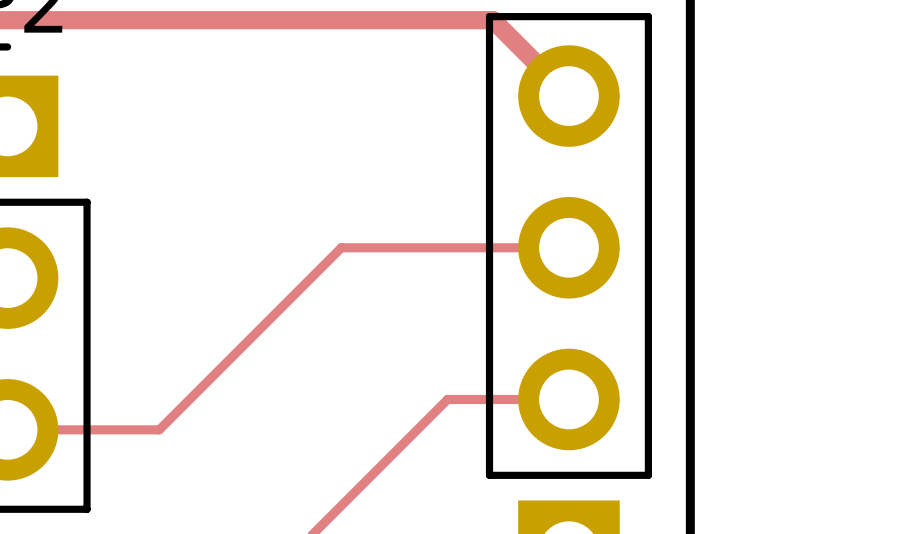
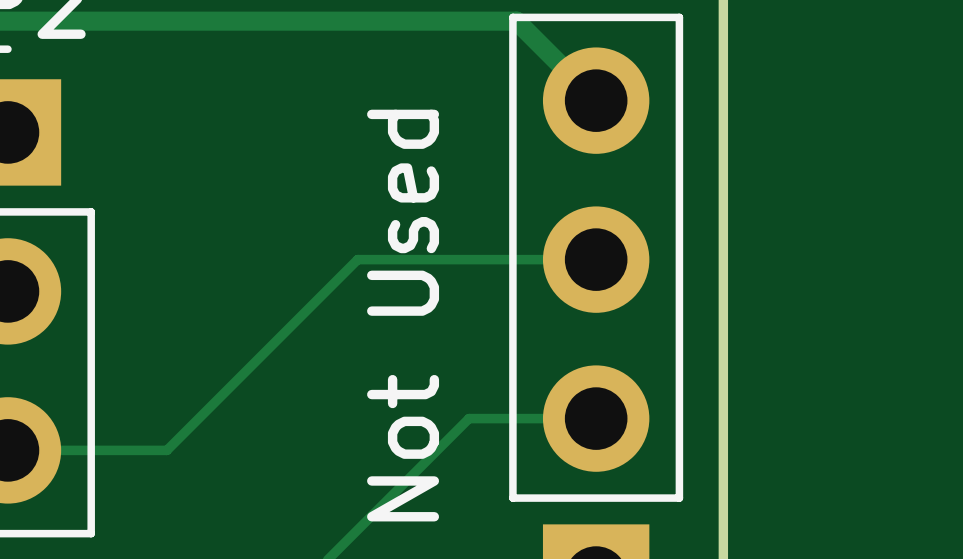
text: none -> Not Used (403, 315)

